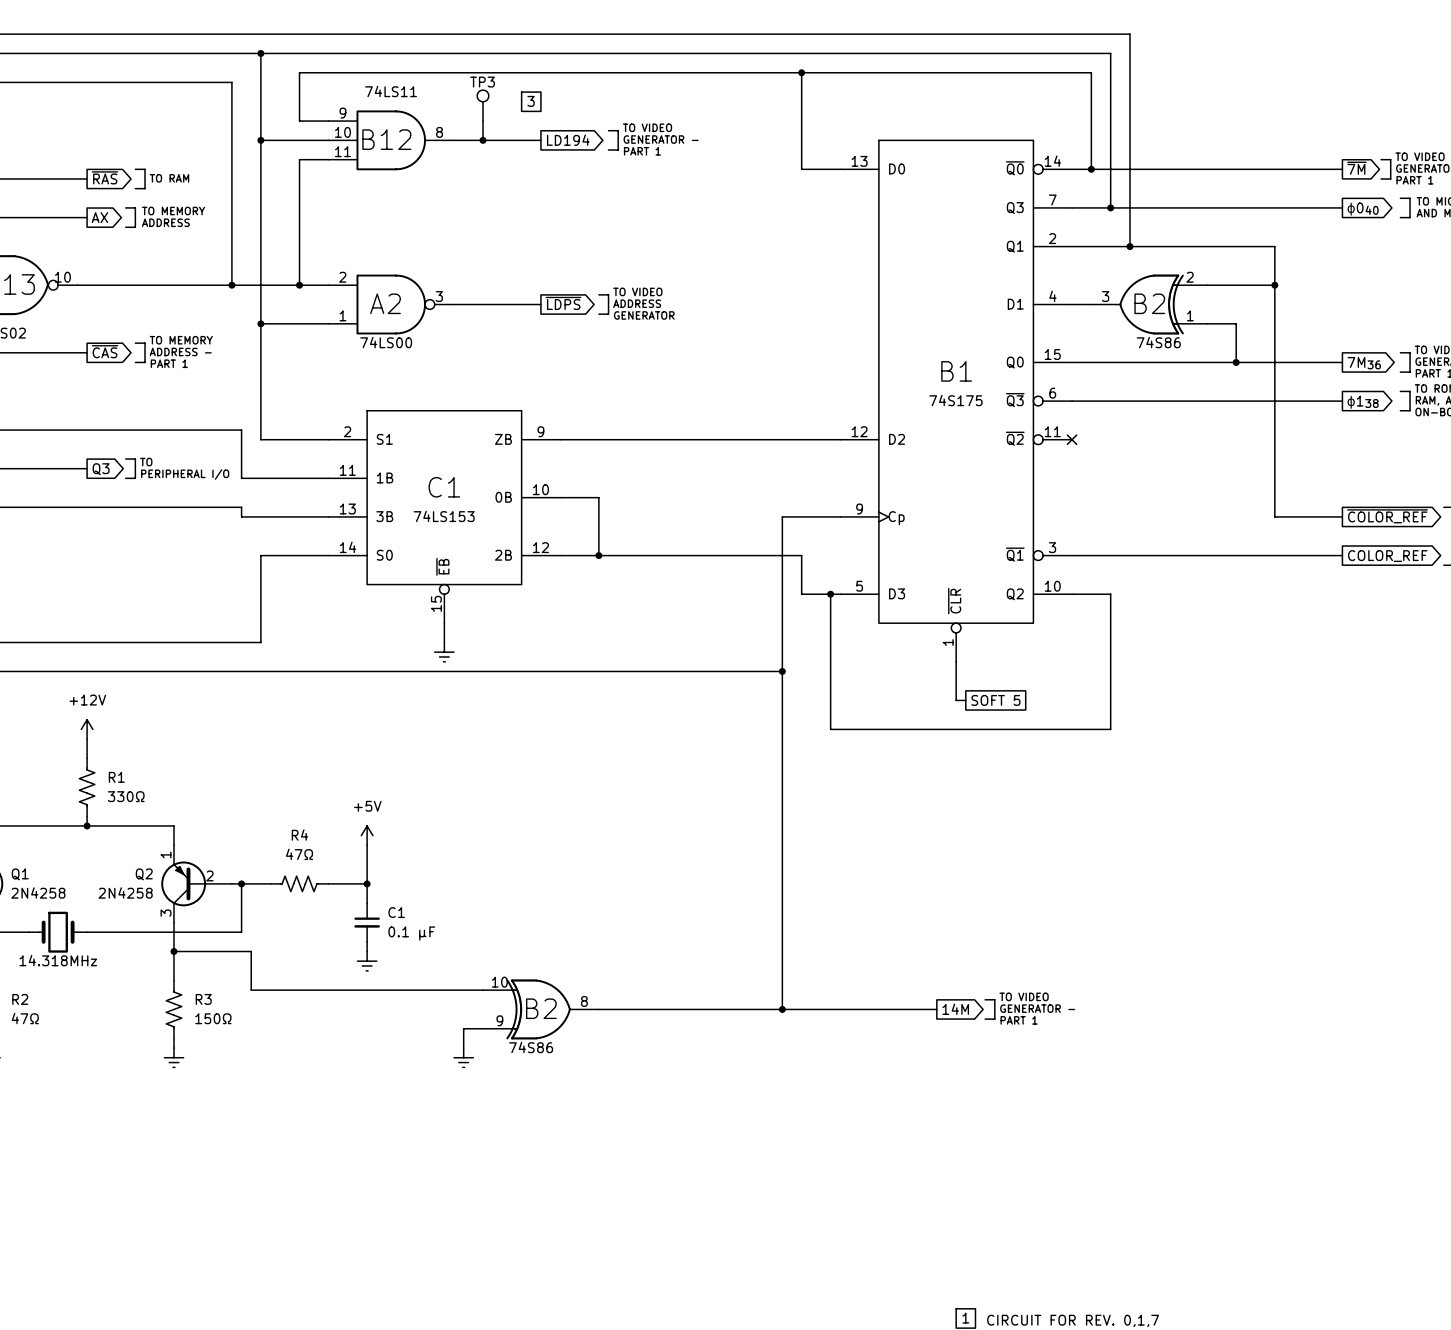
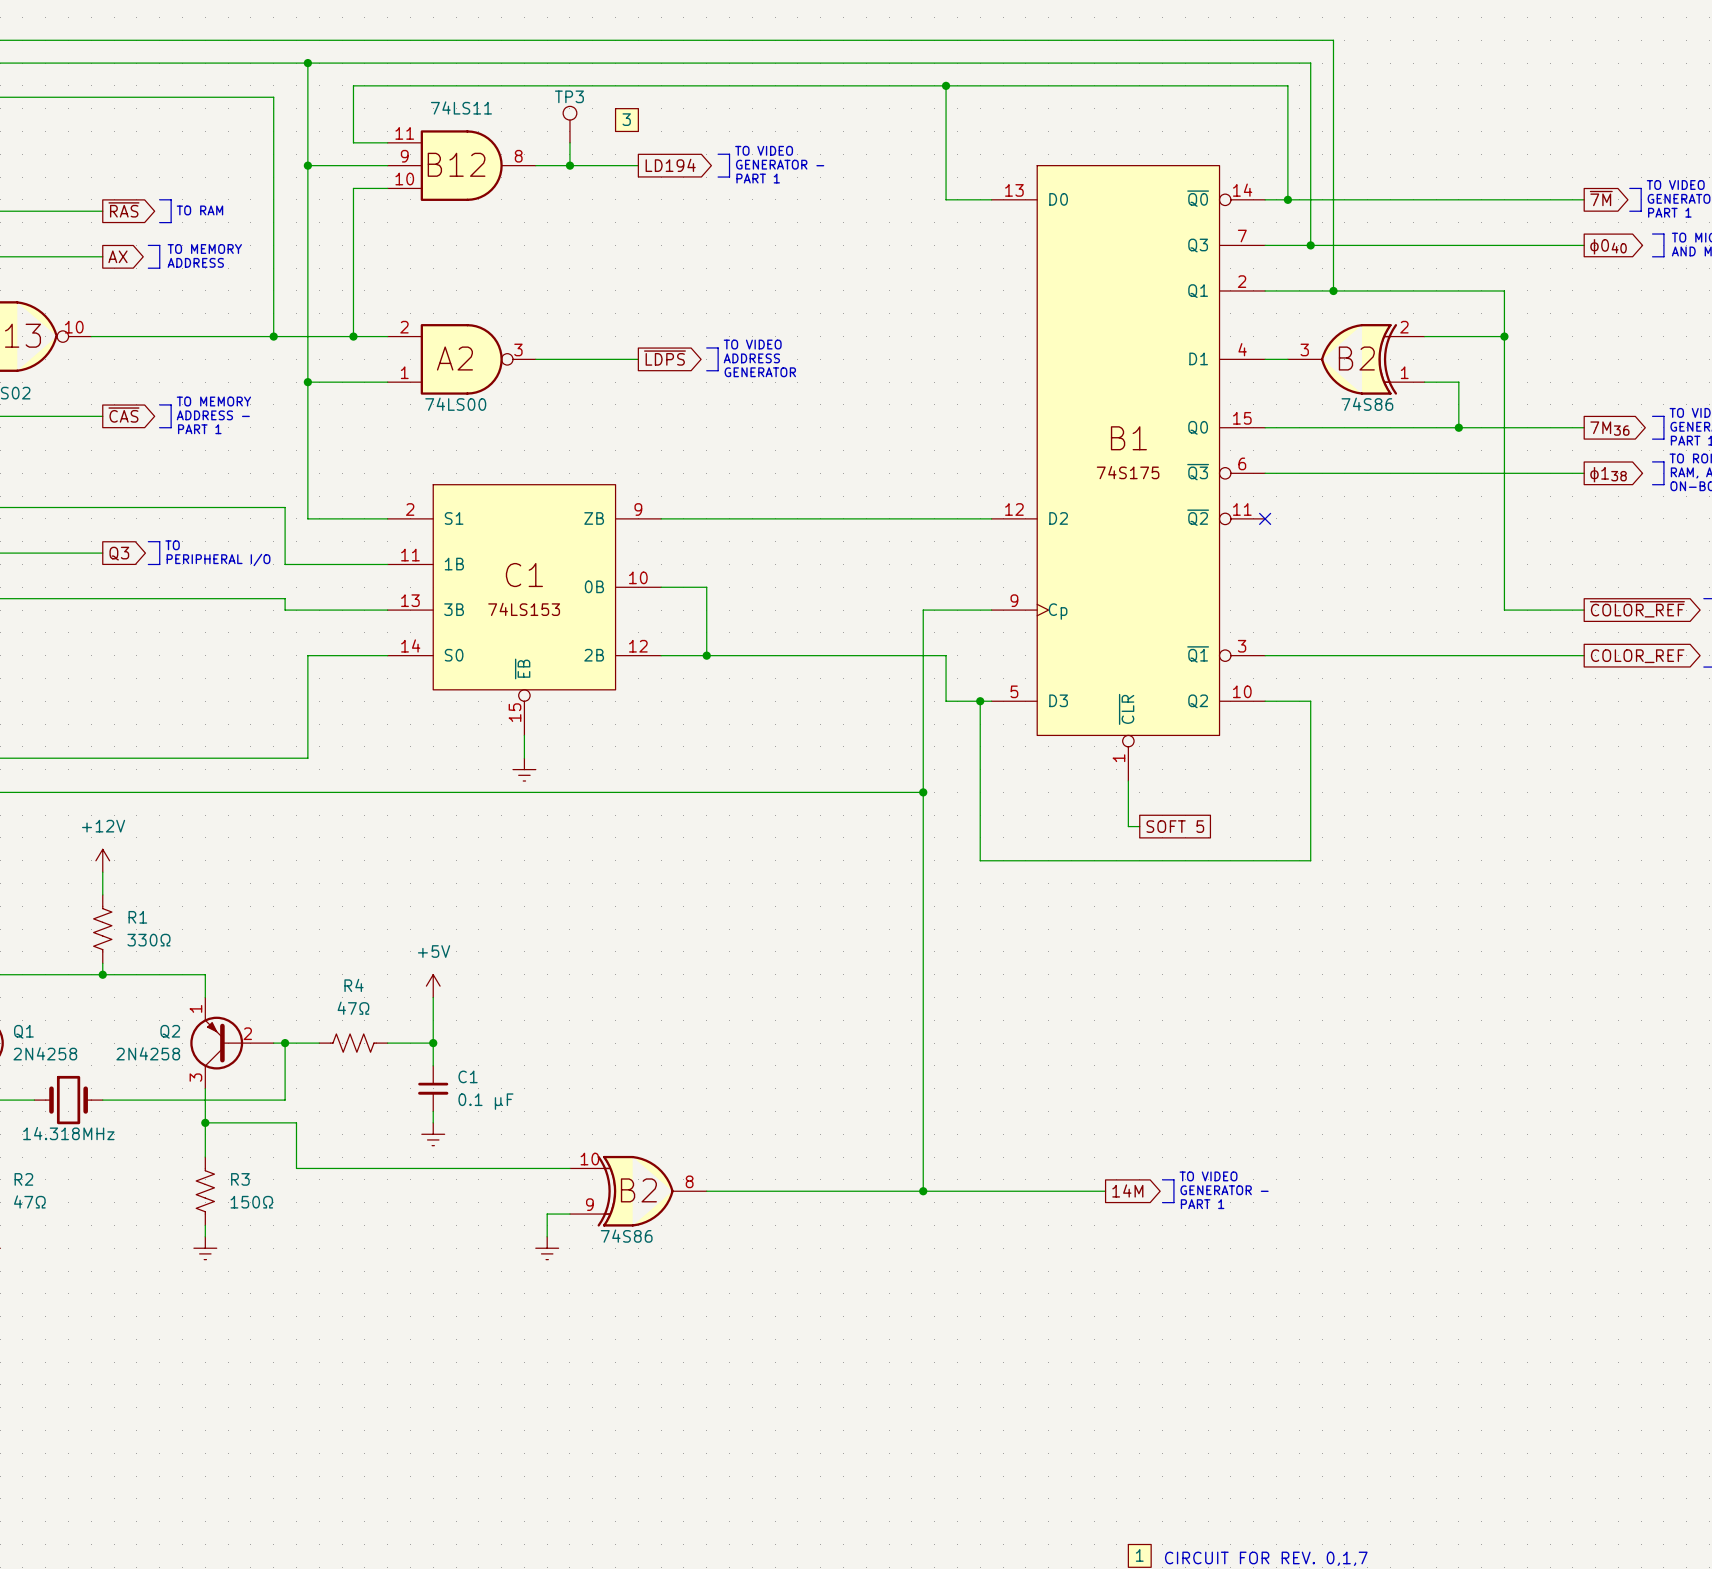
part pin number: 9 (342, 113) -> 11 (404, 133)
part pin number: 10 (342, 132) -> 9 (404, 156)
part pin number: 11 (342, 151) -> 10 (404, 179)

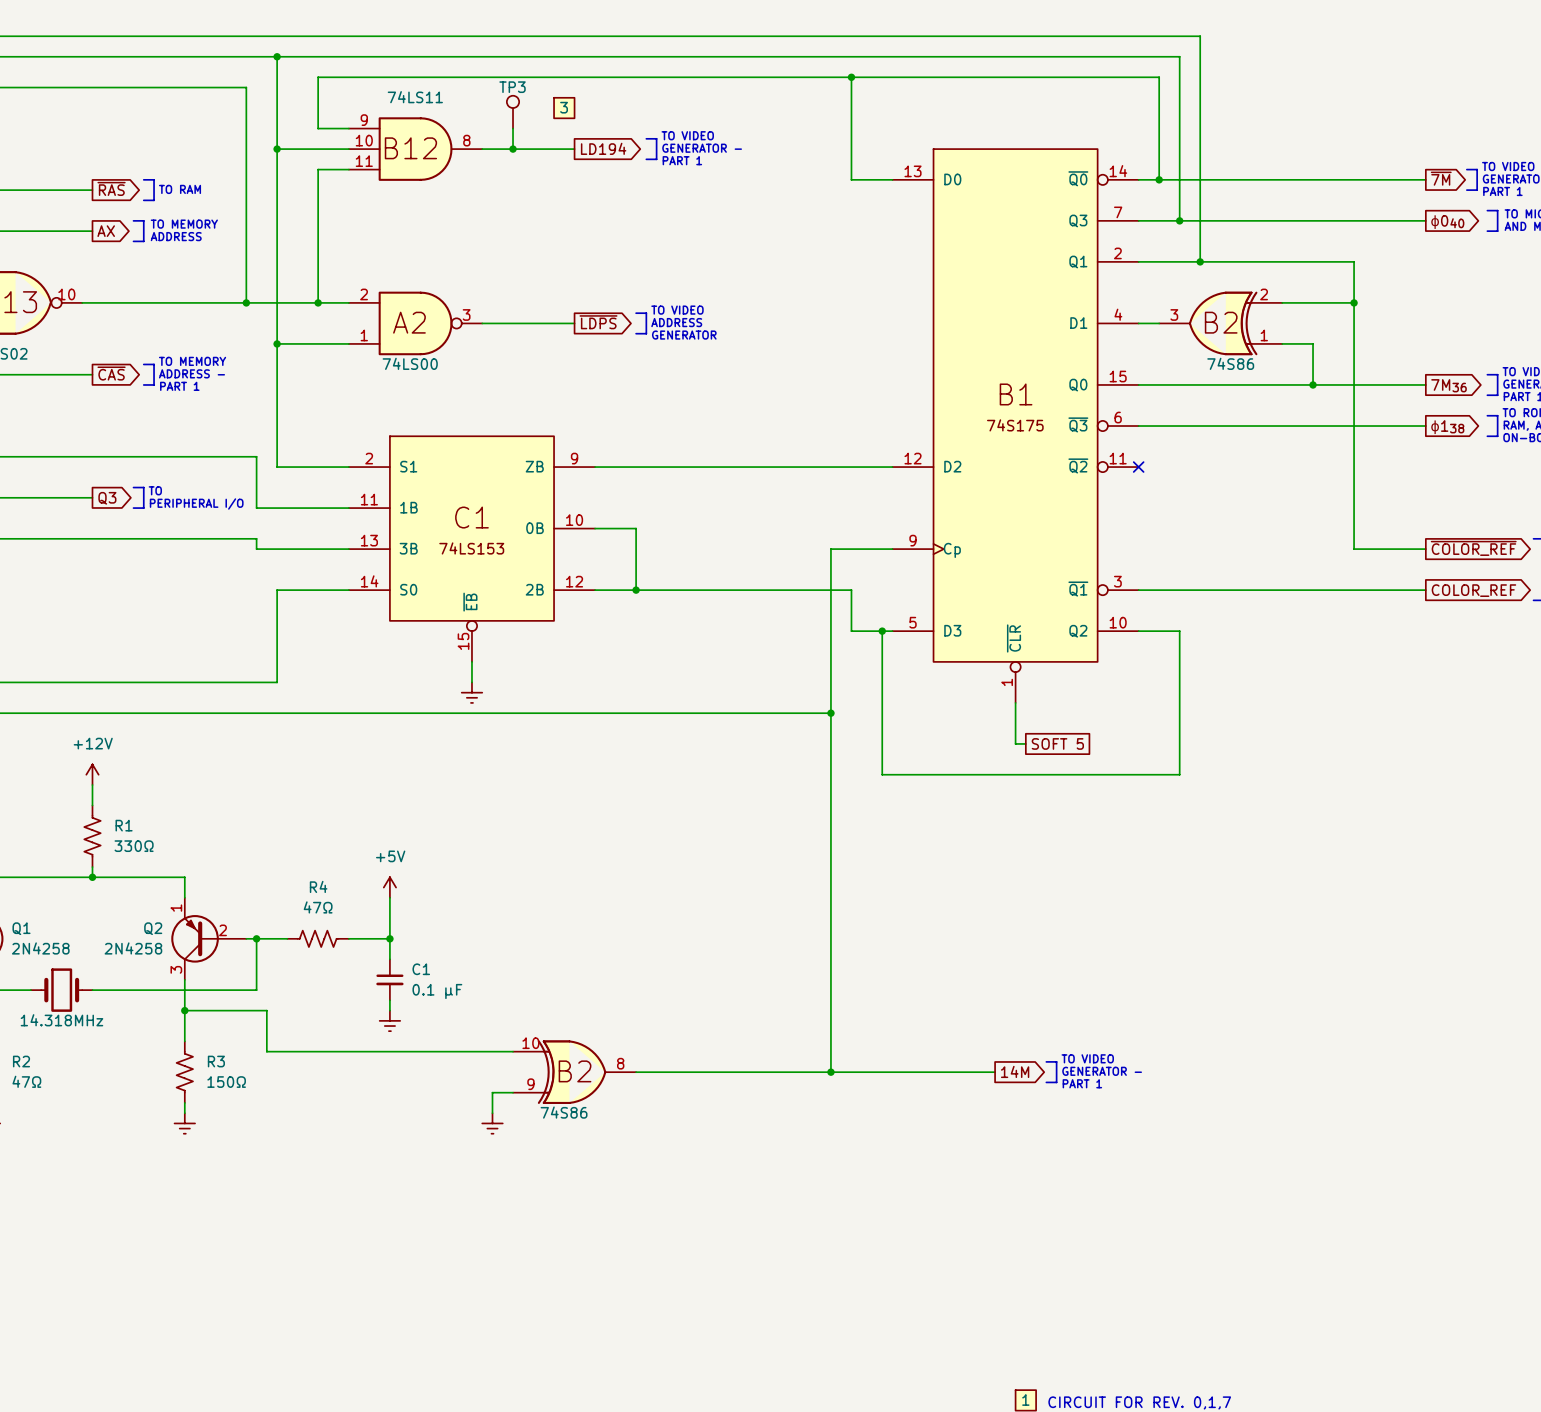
part pin number: 11 (404, 133) -> 9 (364, 120)
part pin number: 9 (404, 156) -> 10 (364, 140)
part pin number: 10 (404, 179) -> 11 (364, 161)

